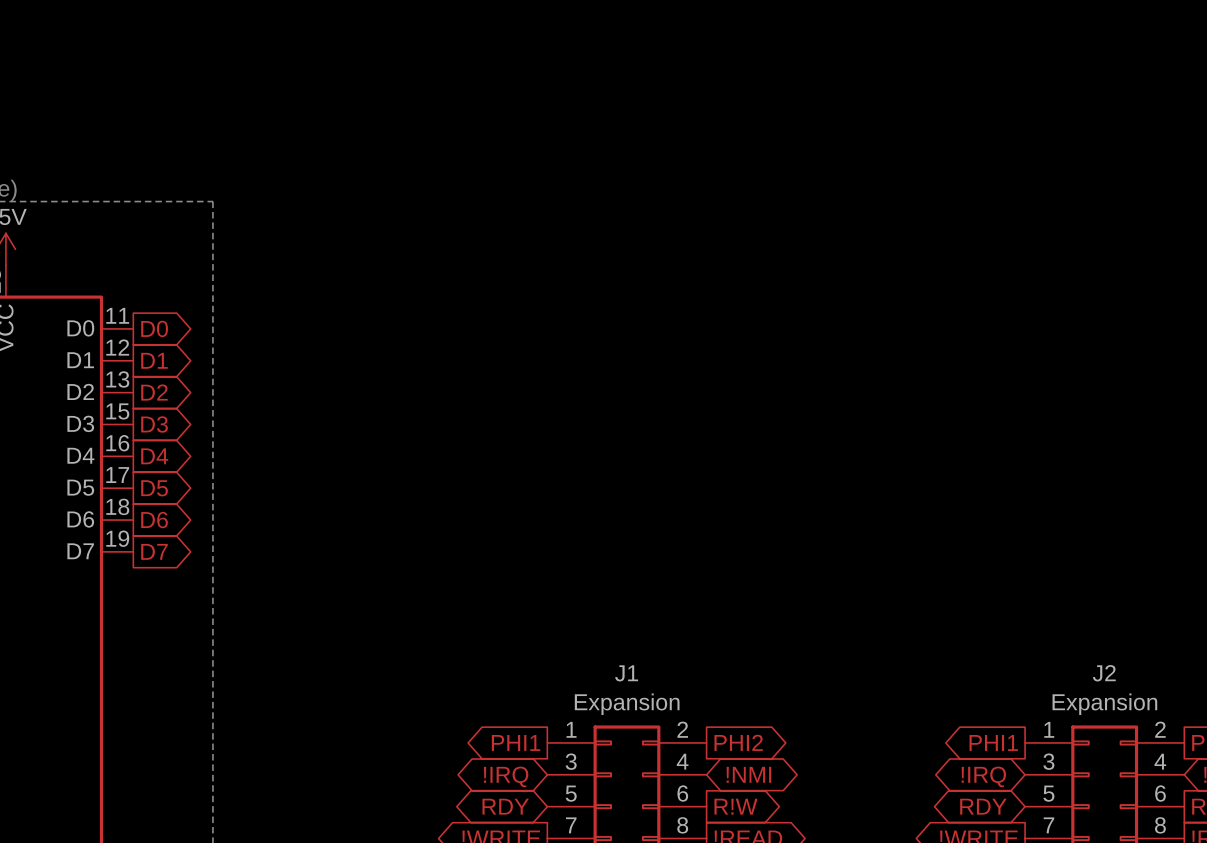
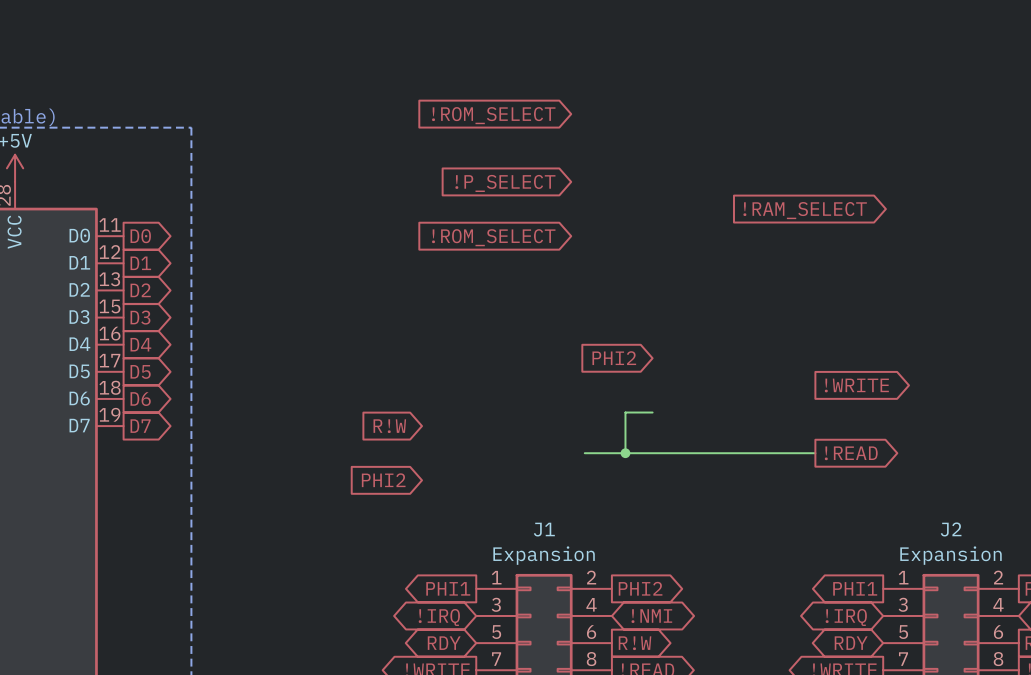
global label: none -> !ROM_SELECT (493, 115)
global label: none -> !P_SELECT (505, 183)
global label: none -> !RAM_SELECT (805, 210)
global label: none -> !ROM_SELECT (493, 237)
global label: none -> PHI2 (614, 358)
global label: none -> !WRITE (856, 385)
wire: none -> (652, 412) (625, 412) (625, 453)
global label: none -> R!W (389, 426)
wire: none -> (584, 453) (815, 453)
junction: none -> (625, 453)
global label: none -> !READ (851, 453)
global label: none -> PHI2 (383, 480)

